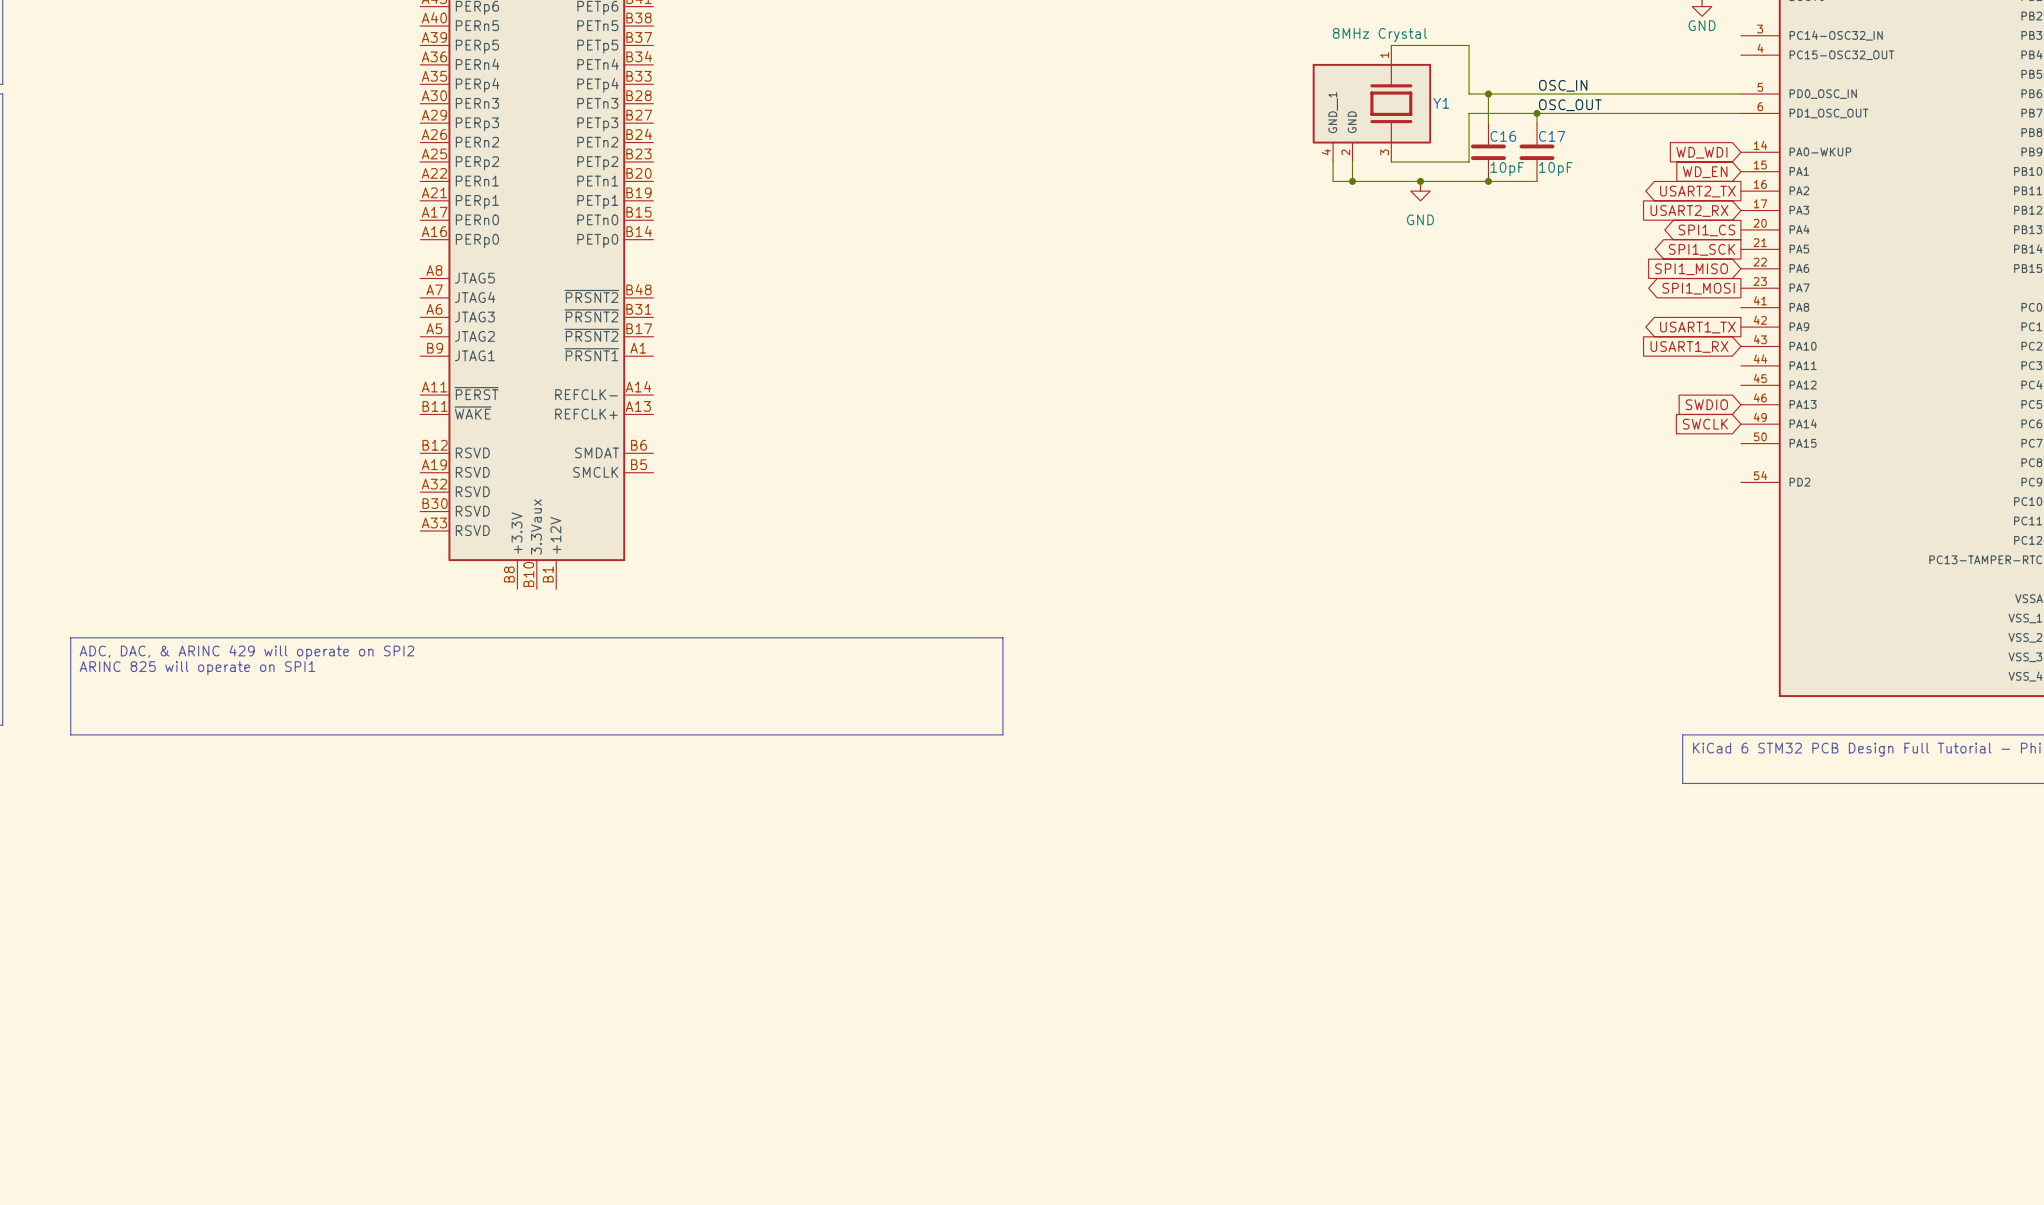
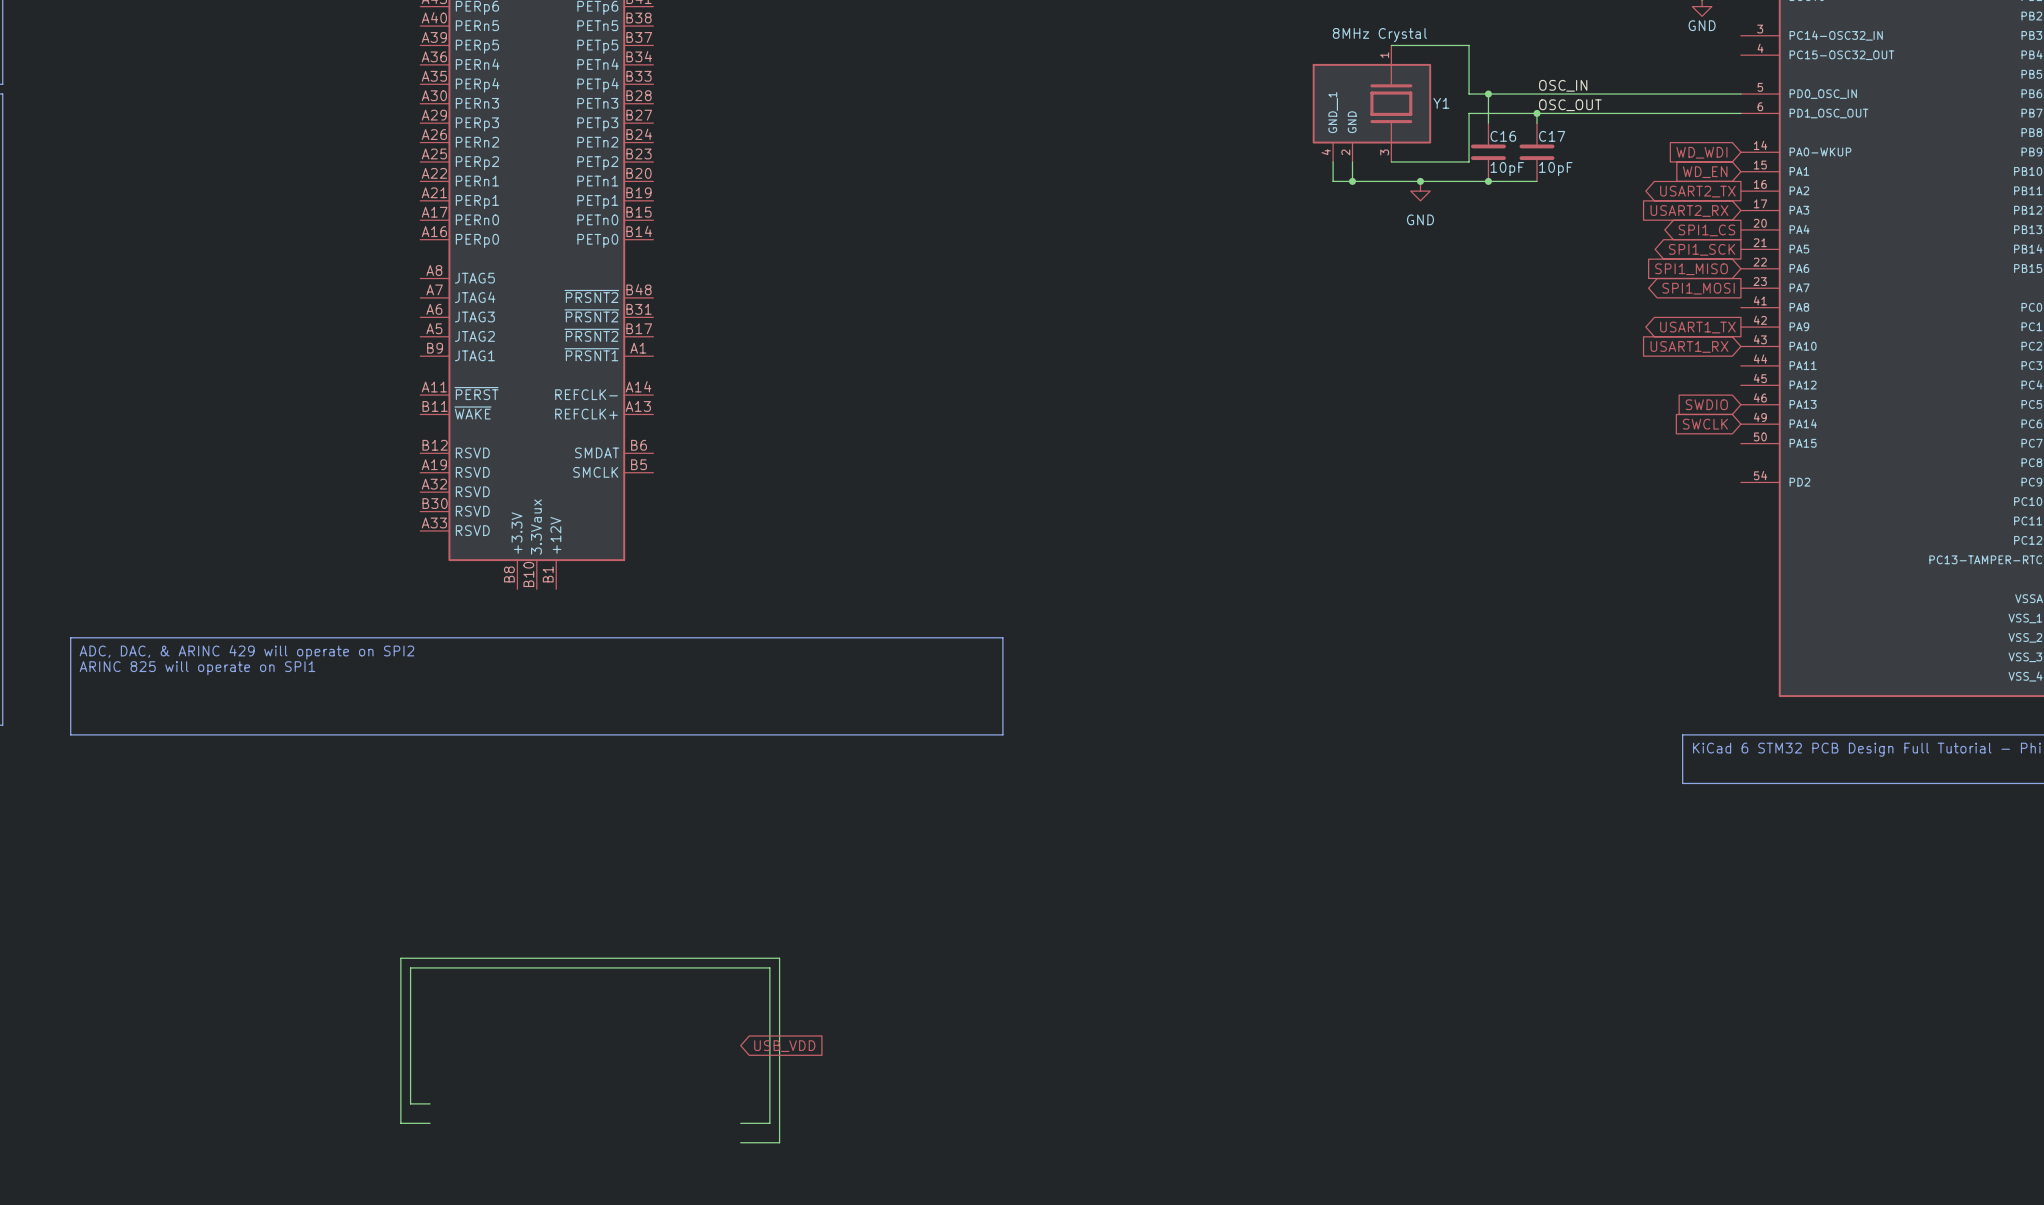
global label: none -> USB_VDD (784, 1046)
wire: none -> (429, 1103) (410, 1103) (410, 967) (769, 967) (769, 1123) (740, 1123)
wire: none -> (429, 1123) (400, 1123) (400, 958) (779, 958) (779, 1142) (740, 1142)

